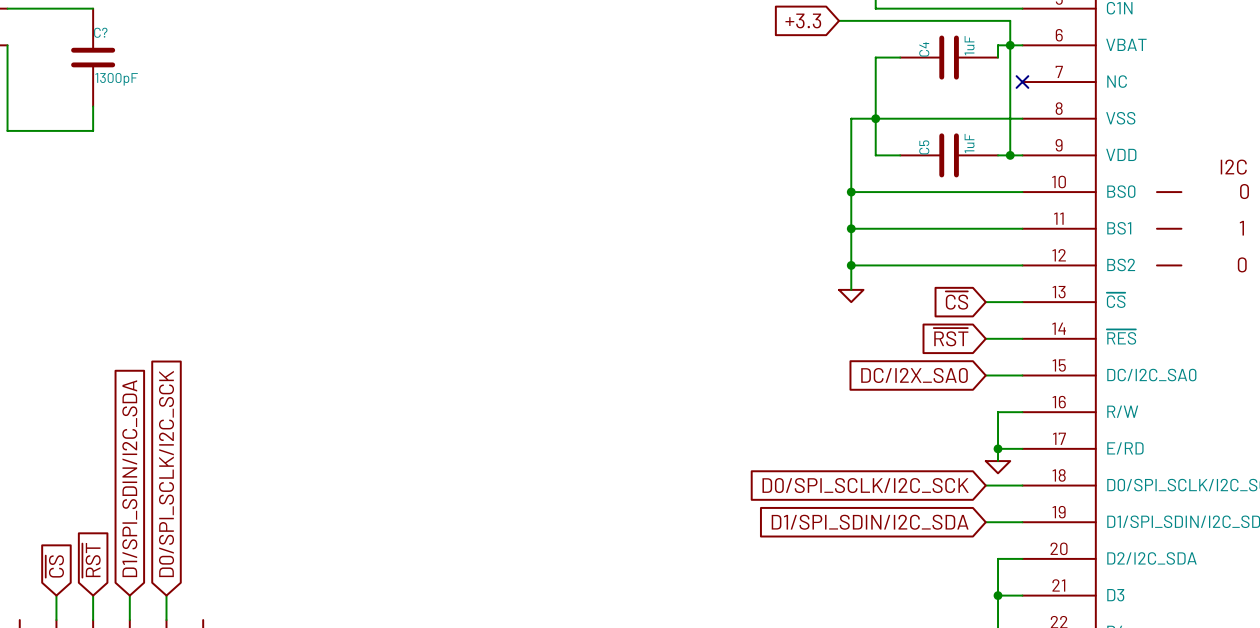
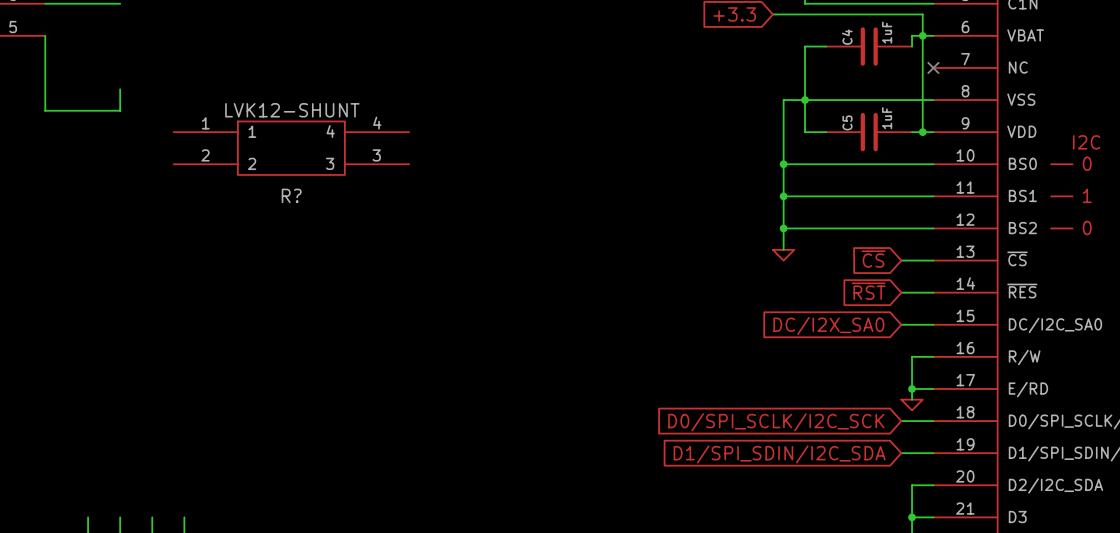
C?: 1300pF (93, 57) -> none
R?: none -> LVK12-SHUNT (291, 148)
global label: D0/SPI_SCLK/I2C_SCK (166, 473) -> none
global label: D1/SPI_SDIN/I2C_SDA (129, 478) -> none
global label: ~{RST} (91, 560) -> none
global label: ~{CS} (54, 566) -> none

